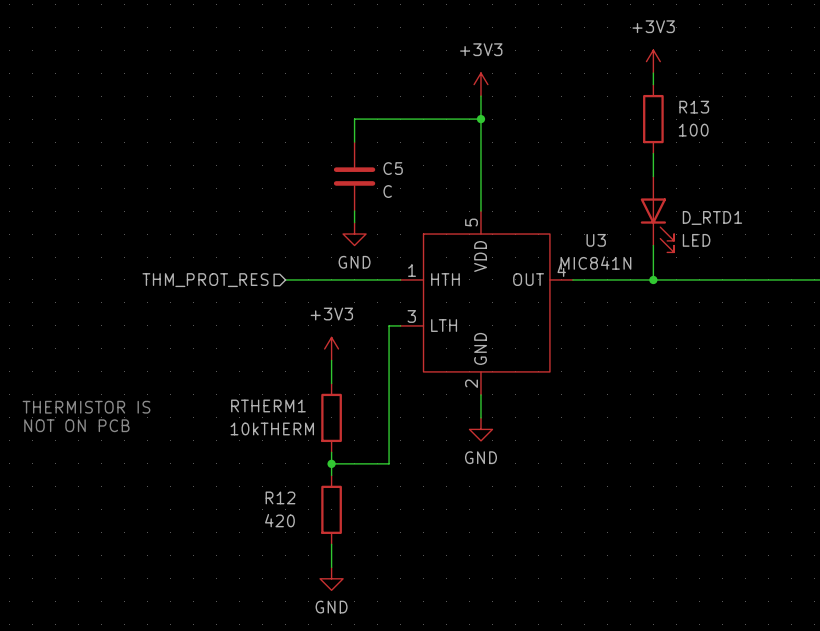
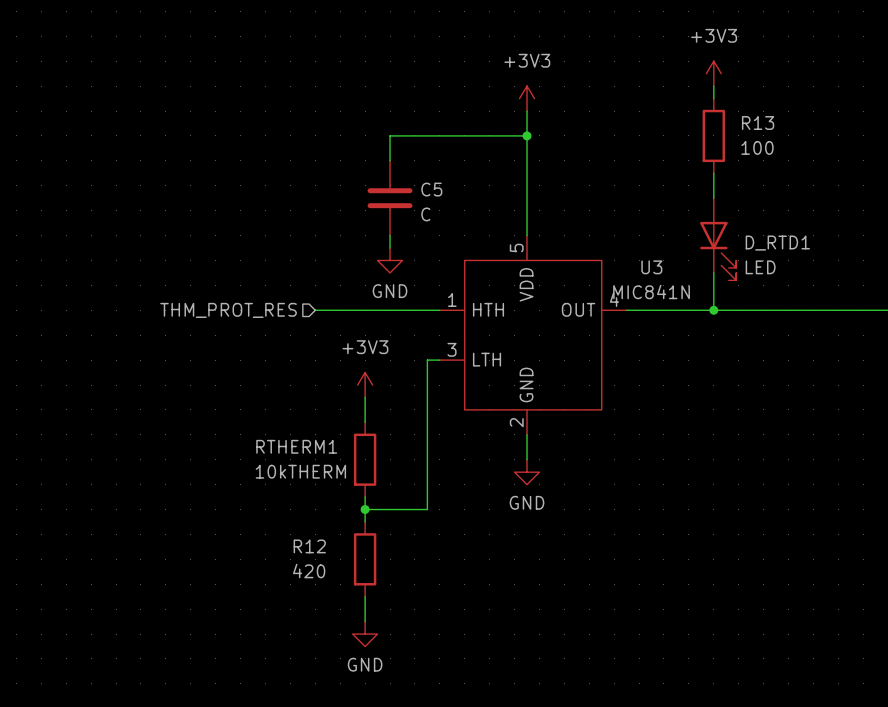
text: THERMISTOR IS (86, 407) -> none
text: NOT ON PCB (76, 425) -> none

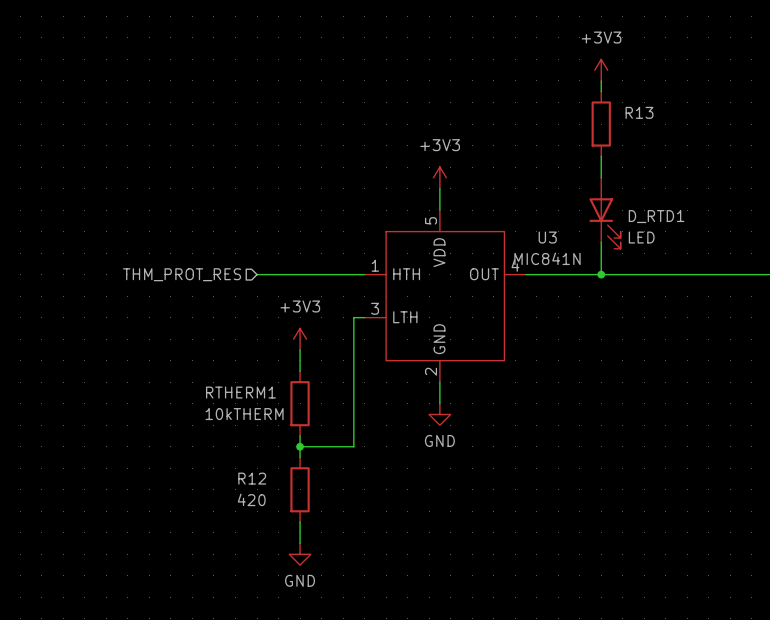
power symbol position: +3V3 (527, 98) -> +3V3 (439, 177)
wire: (527, 111) (527, 210) -> none
wire: (527, 135) (390, 135) (390, 160) -> none
junction: (527, 135) -> none
R13 value: 100 (757, 147) -> none
C5: C (390, 198) -> none
wire: (390, 235) (390, 248) -> none
power symbol: GND (390, 260) -> none

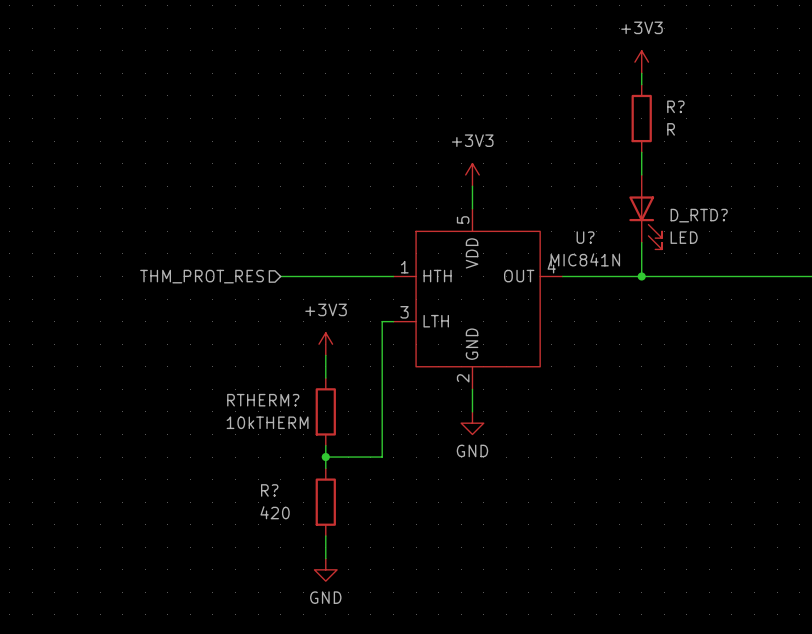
R13 name: R13 (639, 112) -> R? (675, 106)
R13 value: none -> R (671, 129)
D_RTD1 name: D_RTD1 (656, 216) -> D_RTD? (699, 215)
U3 name: U3 (547, 237) -> U? (585, 237)
RTHERM1 name: RTHERM1 (240, 392) -> RTHERM? (263, 400)
R12 name: R12 (252, 478) -> R? (269, 490)

